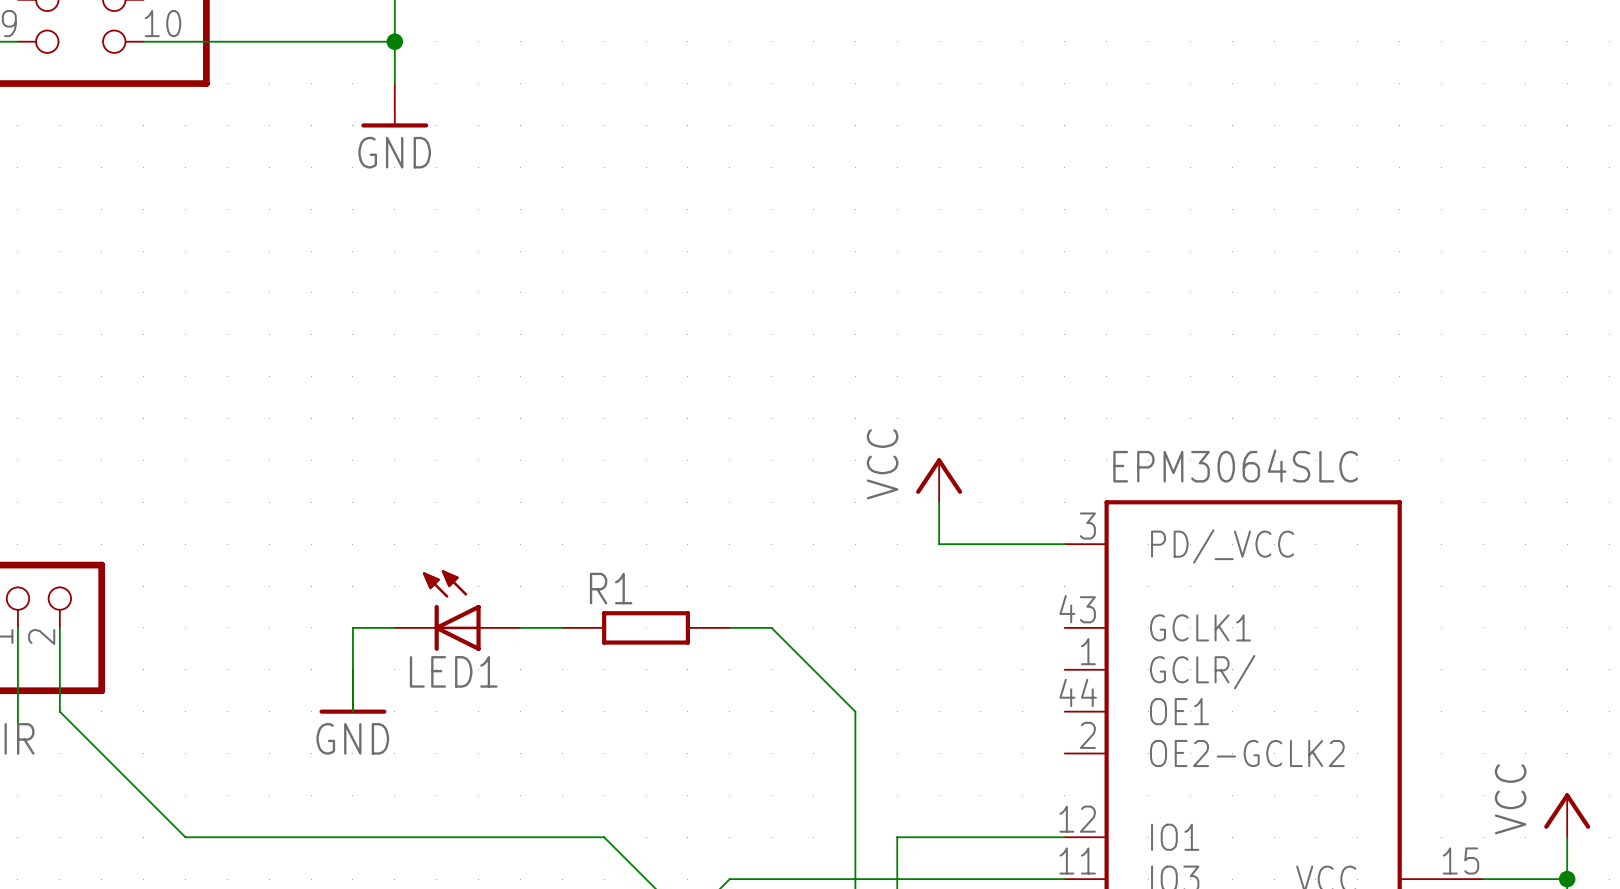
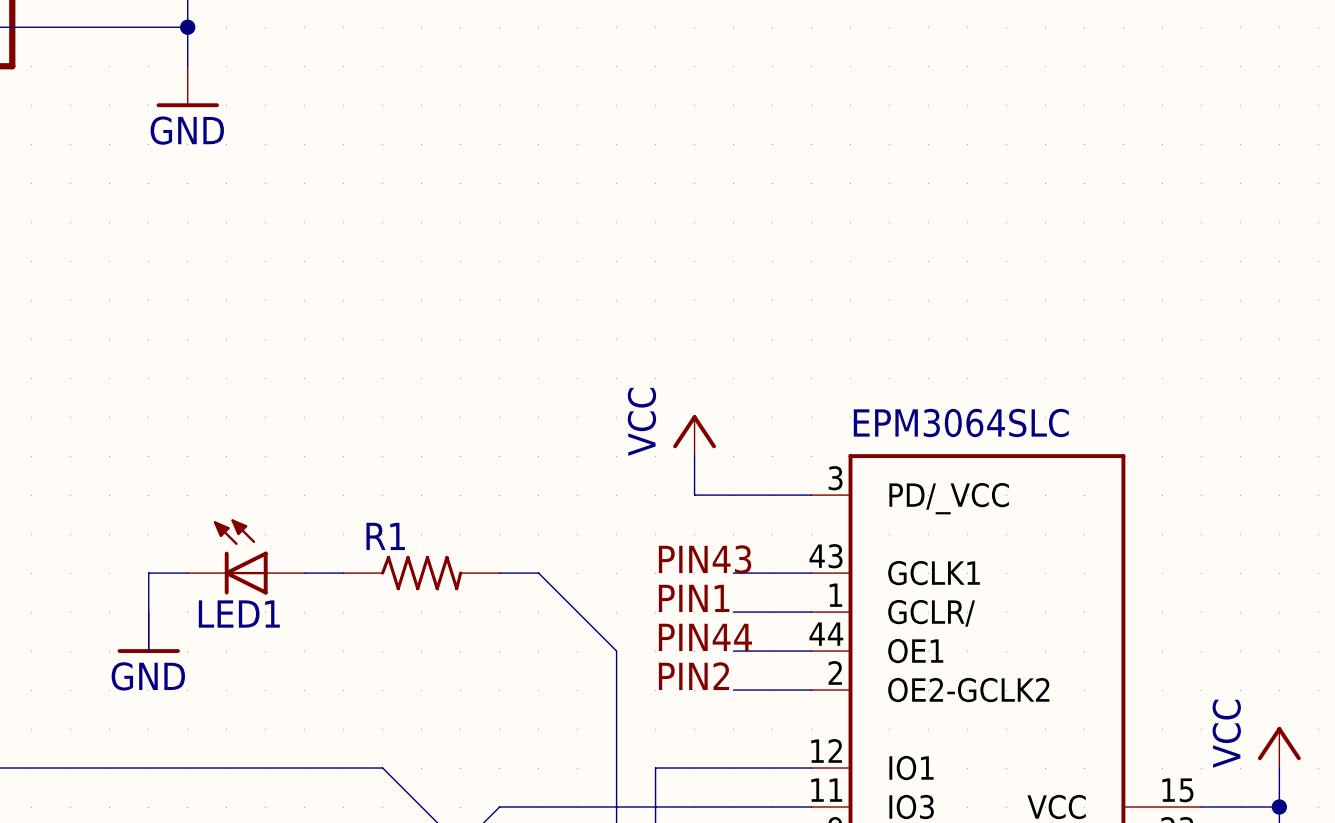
R1 symbol: [562, 611, 730, 645] -> [343, 555, 500, 591]
label: none -> PIN43 (705, 559)
wire: none -> (733, 573) (811, 573)
label: none -> PIN1 (694, 598)
wire: none -> (733, 612) (811, 612)
label: none -> PIN44 (705, 637)
wire: none -> (733, 651) (811, 651)
label: none -> PIN2 (693, 676)
wire: none -> (733, 690) (811, 690)

